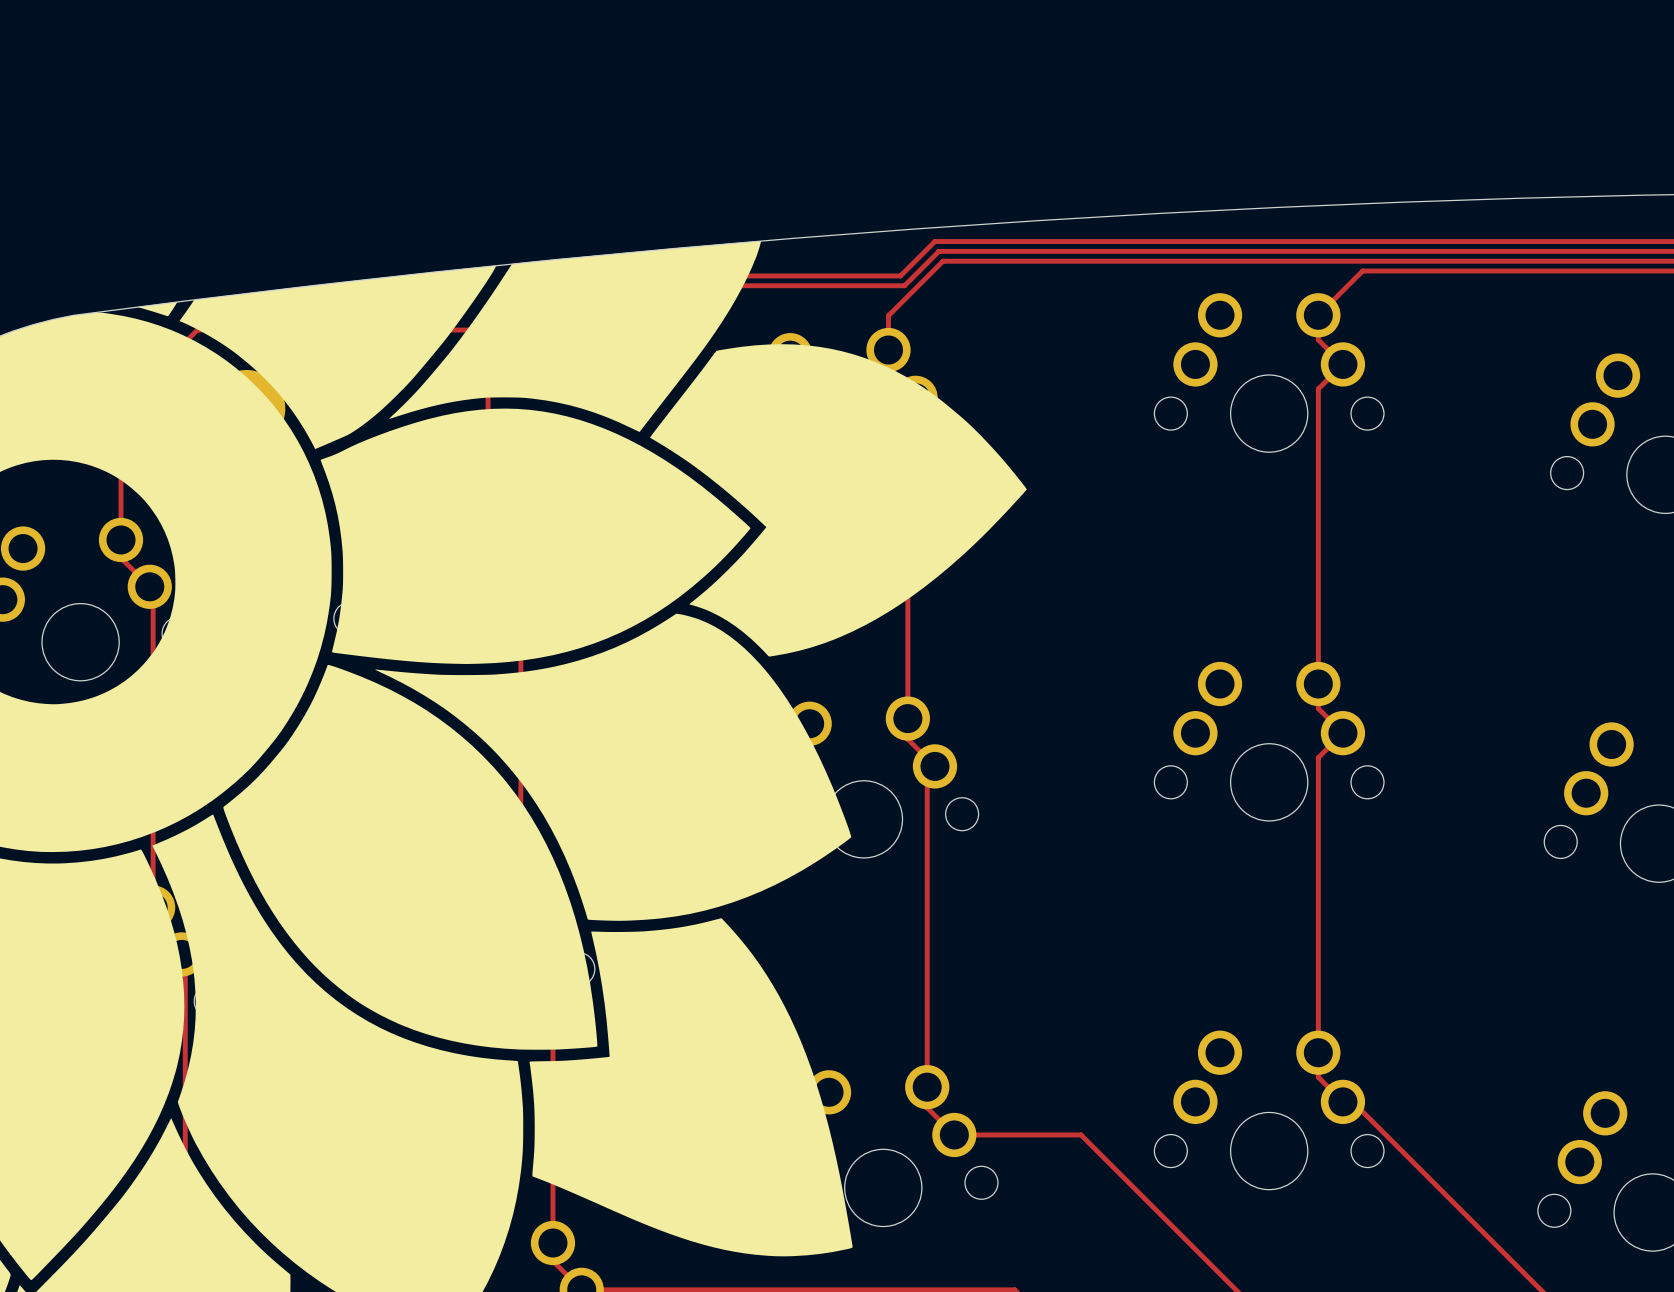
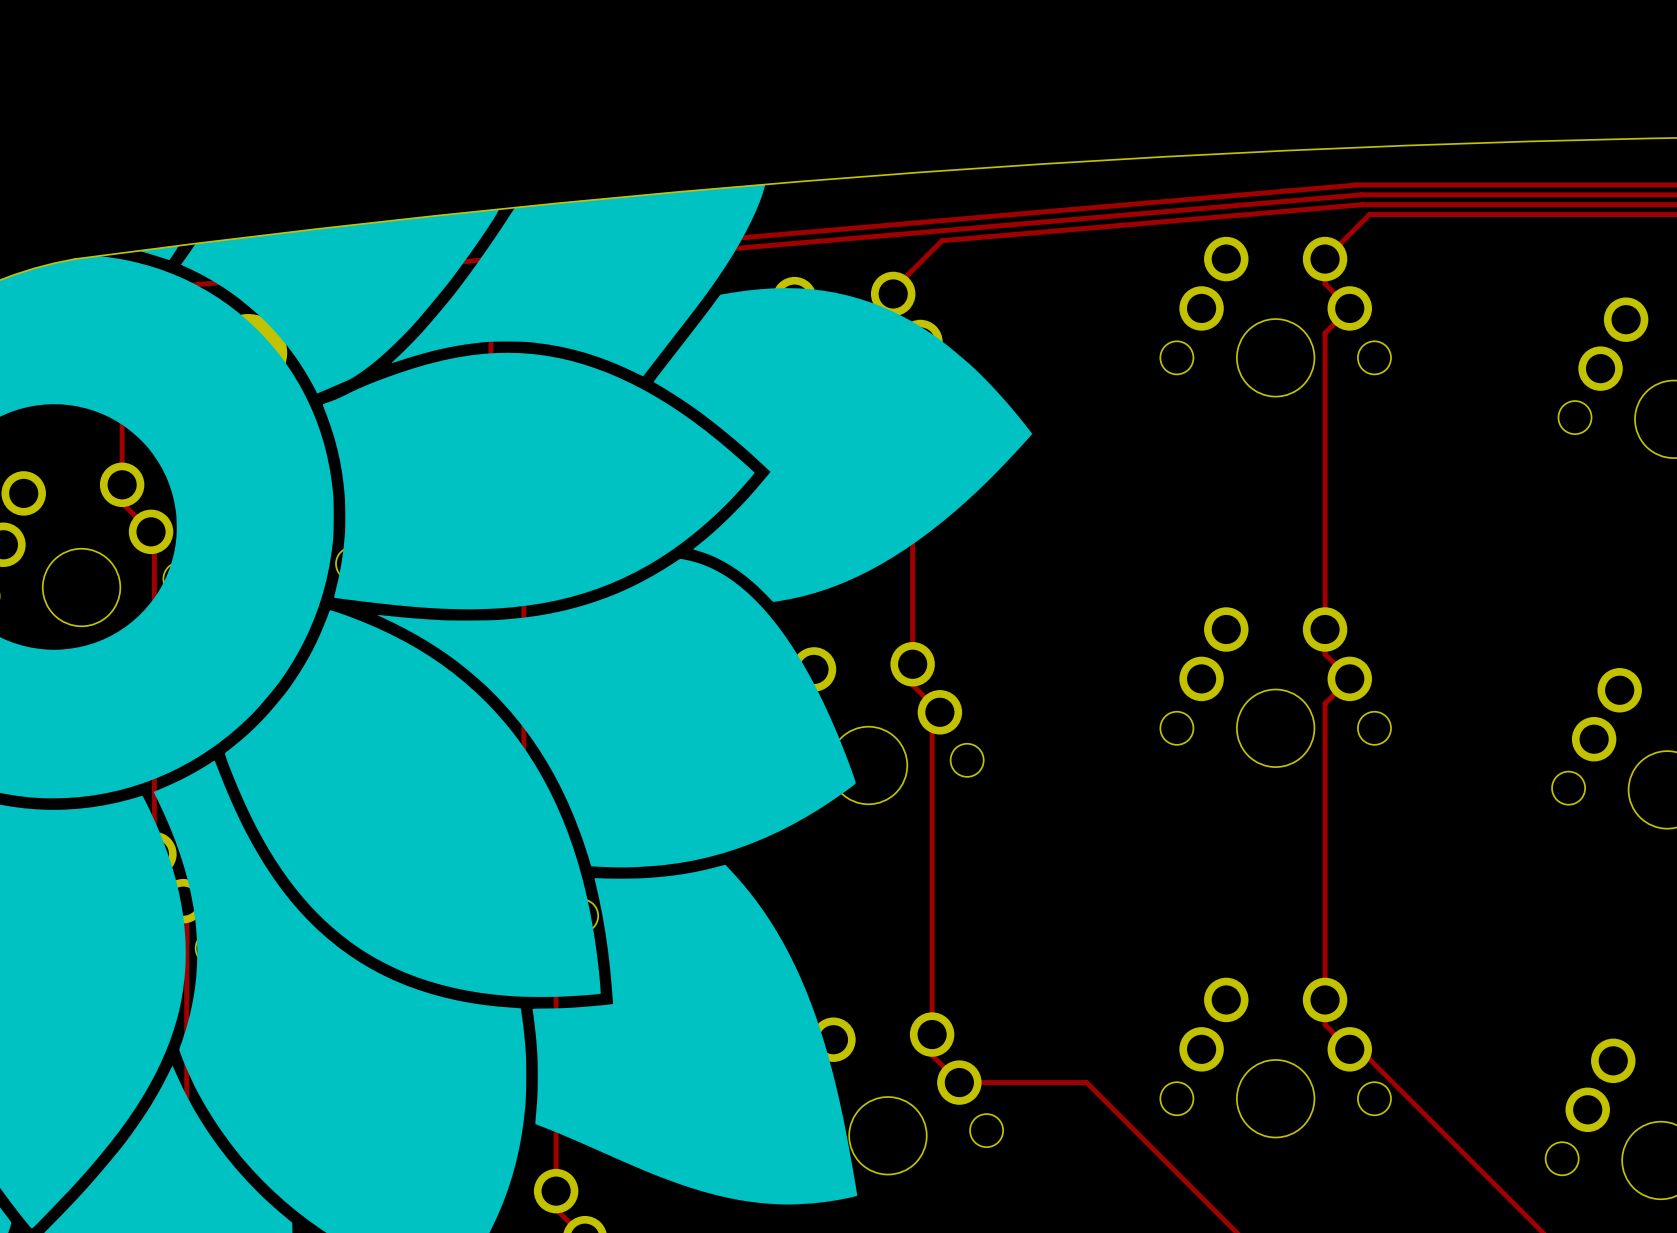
track: (1350, 241) (934, 241) (900, 275) (536, 275) (482, 330) (197, 330) (121, 406) -> (1357, 184) (149, 288) (122, 315) (122, 350)
track: (1354, 251) (938, 251) (904, 285) (540, 285) (488, 338) (488, 356) -> (1361, 194) (524, 266) (490, 300)
track: (1355, 261) (943, 261) (888, 315) (888, 345) -> (1362, 204) (942, 240) (893, 289)

